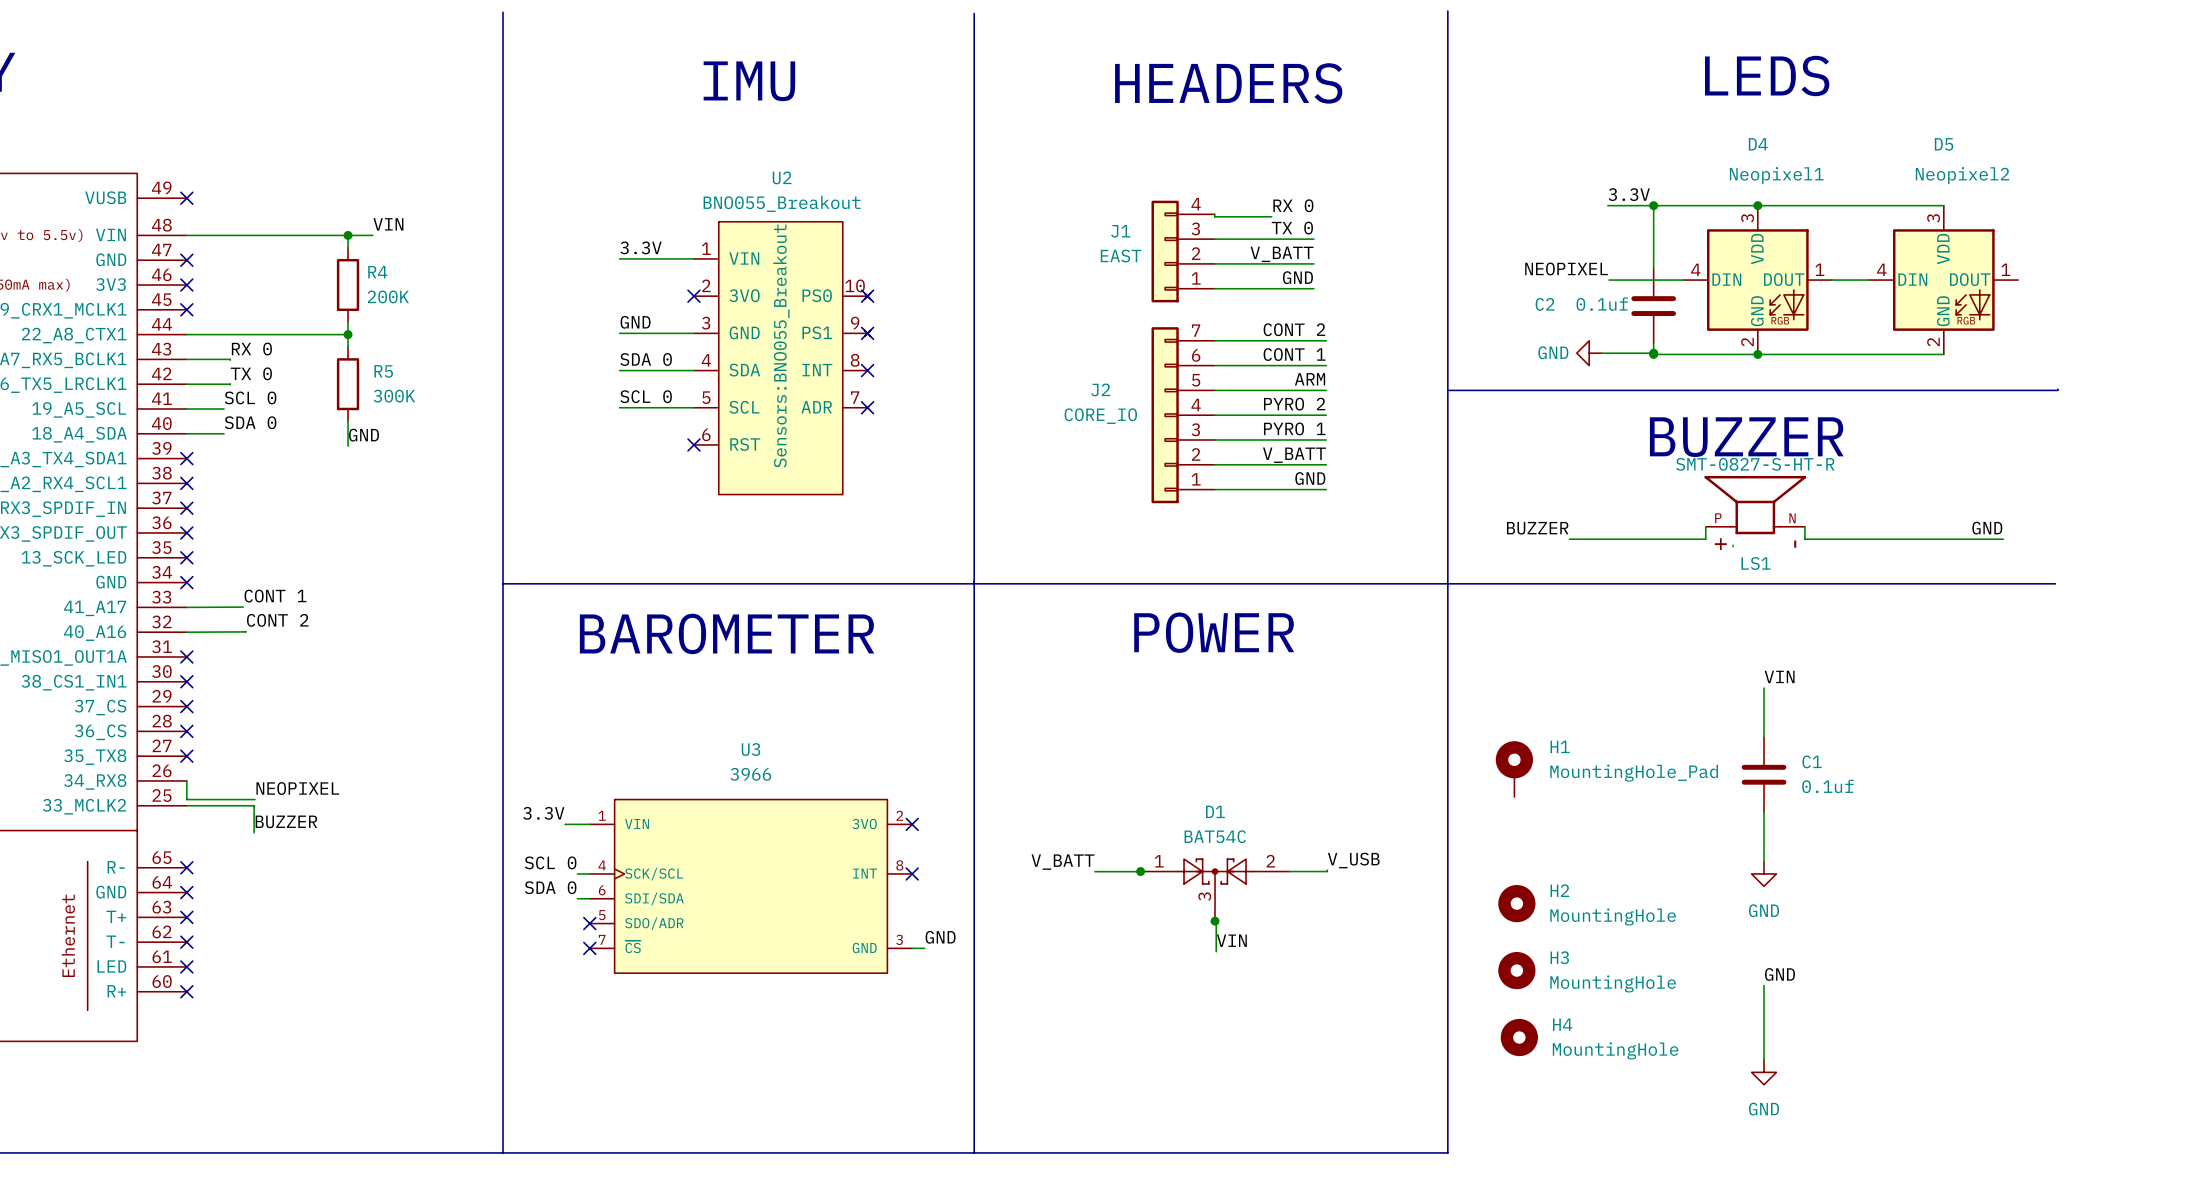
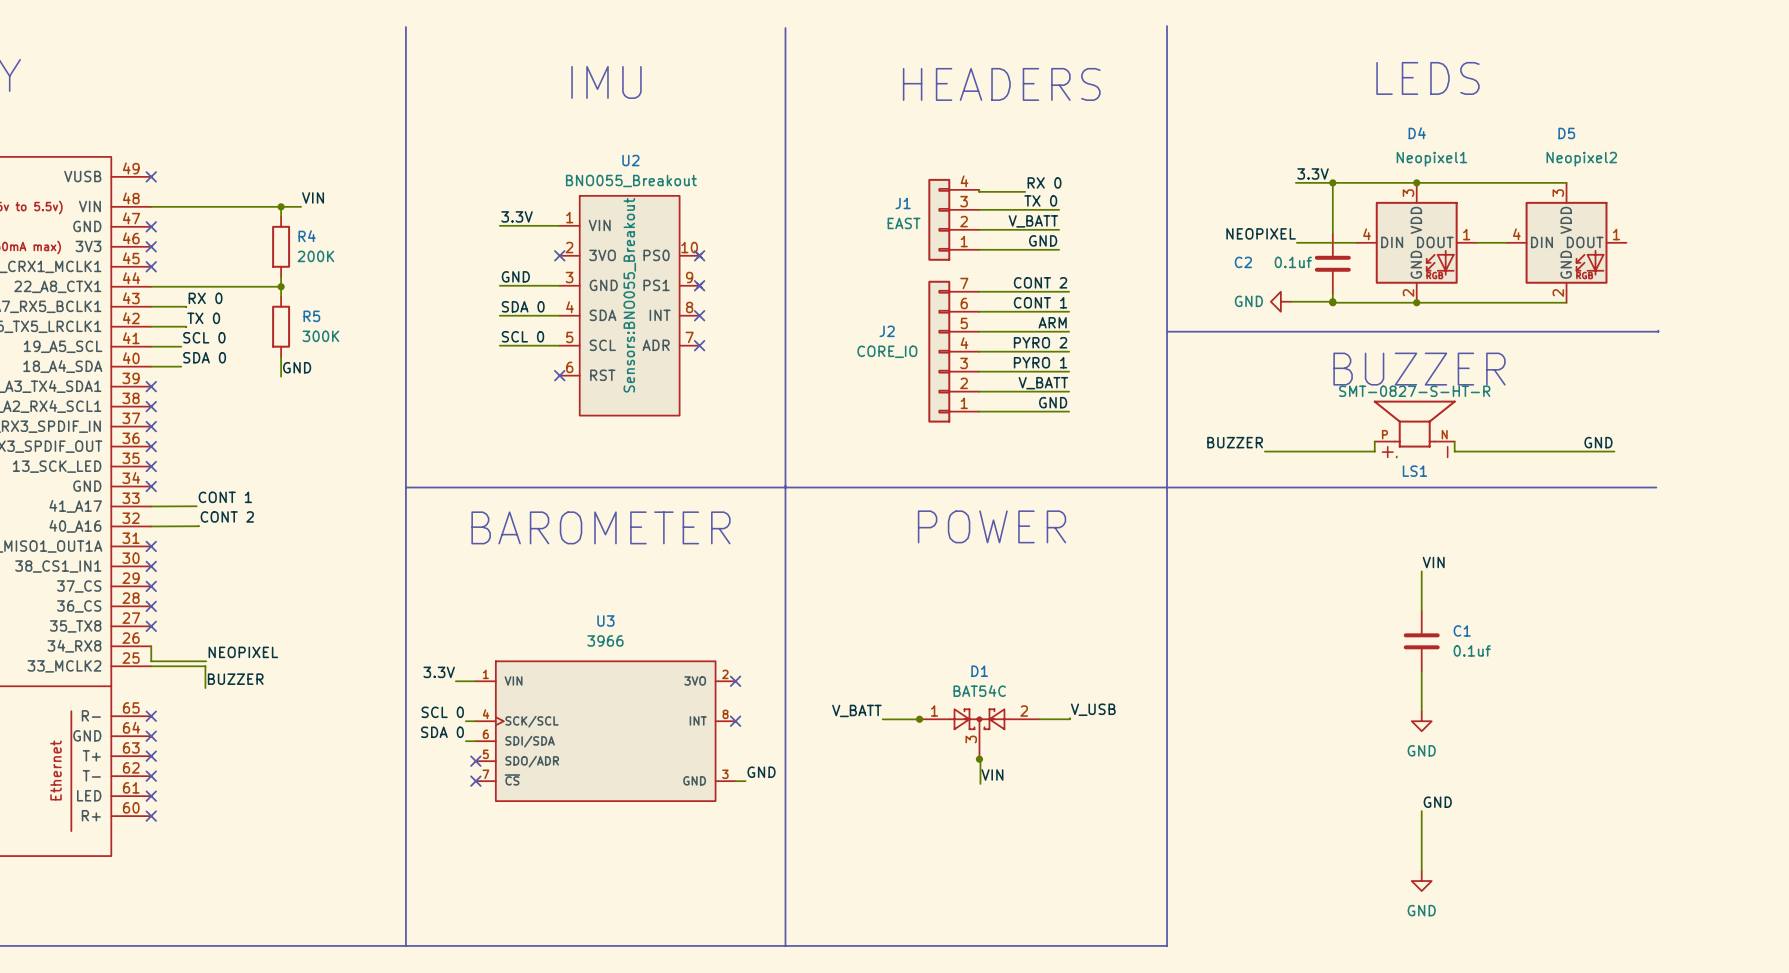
H1: MountingHole_Pad (1514, 769) -> none
H2: MountingHole (1516, 903) -> none
H3: MountingHole (1516, 970) -> none
H4: MountingHole (1519, 1037) -> none

